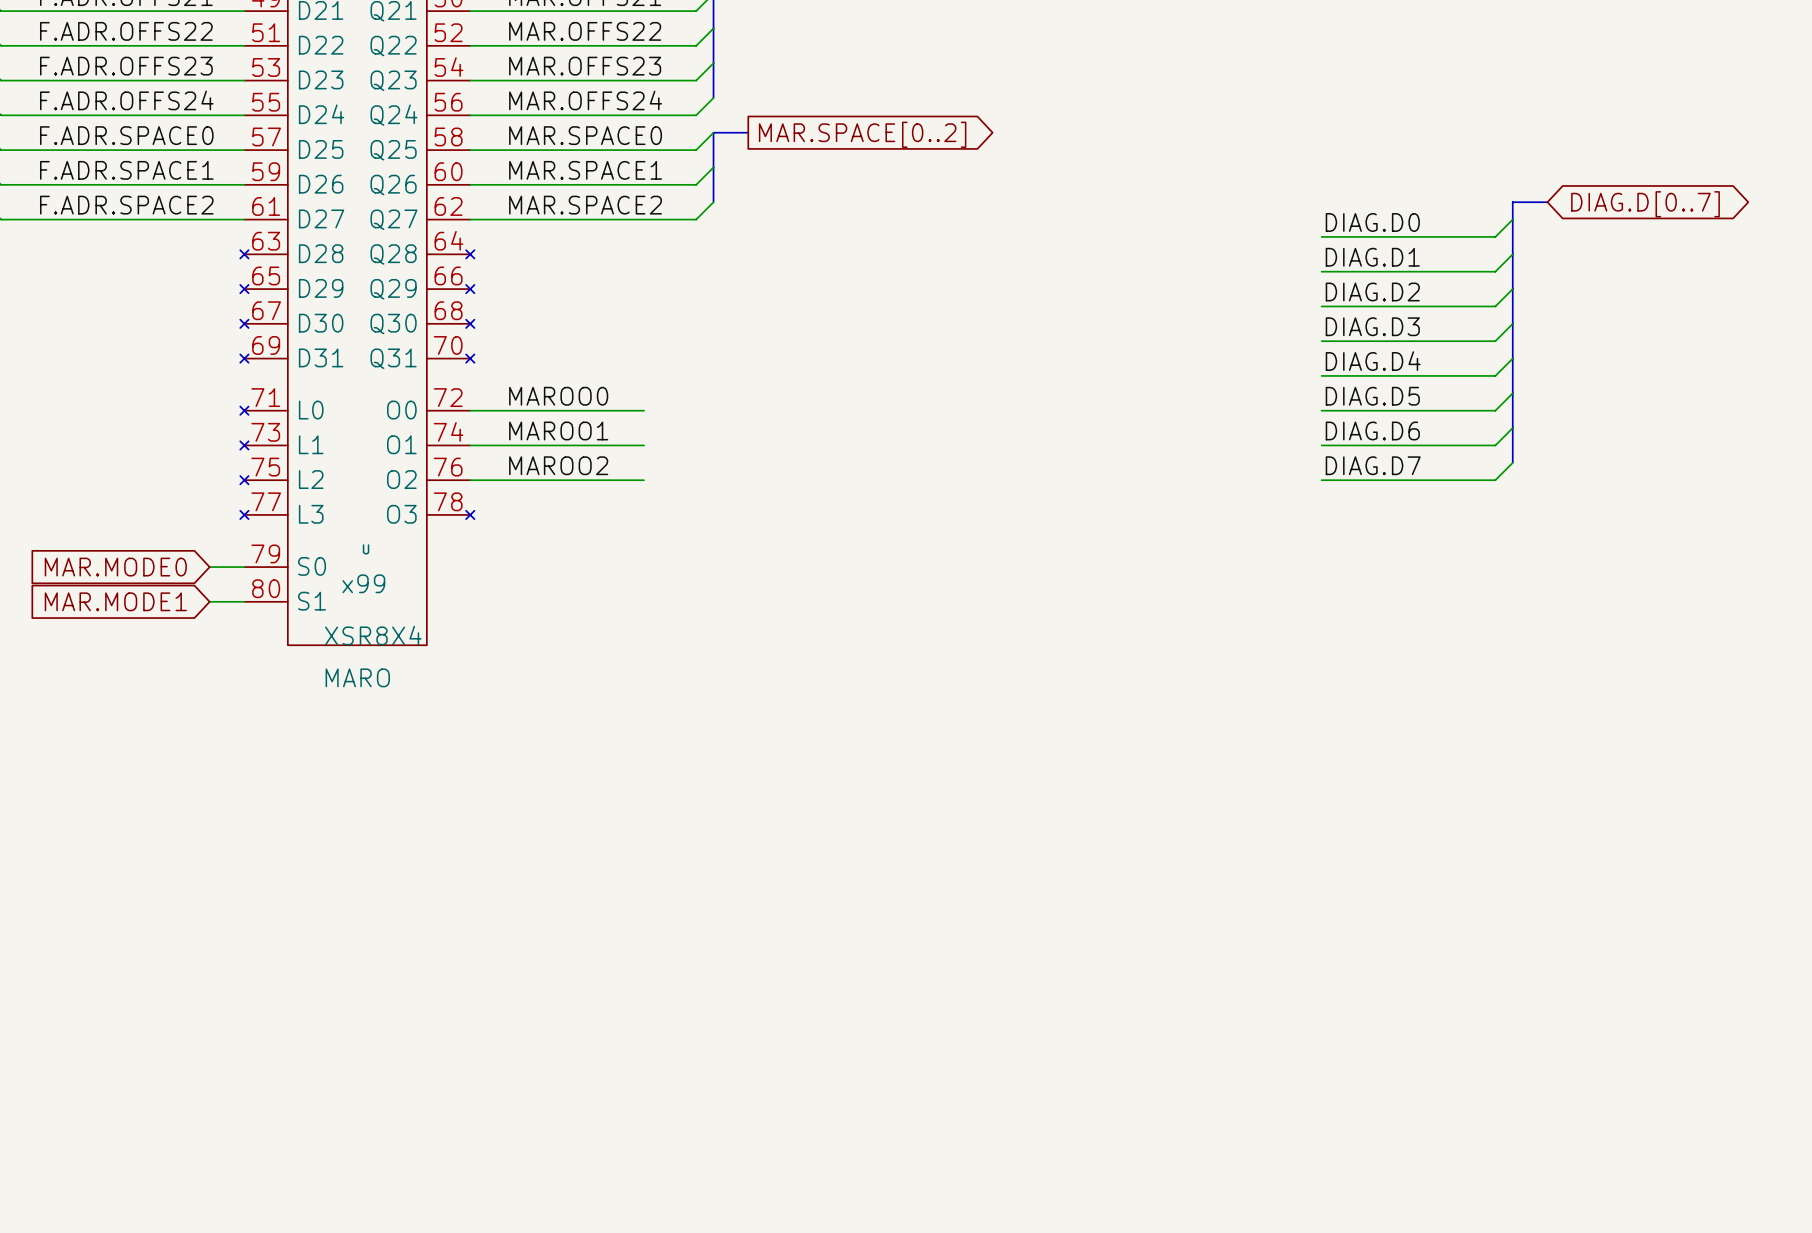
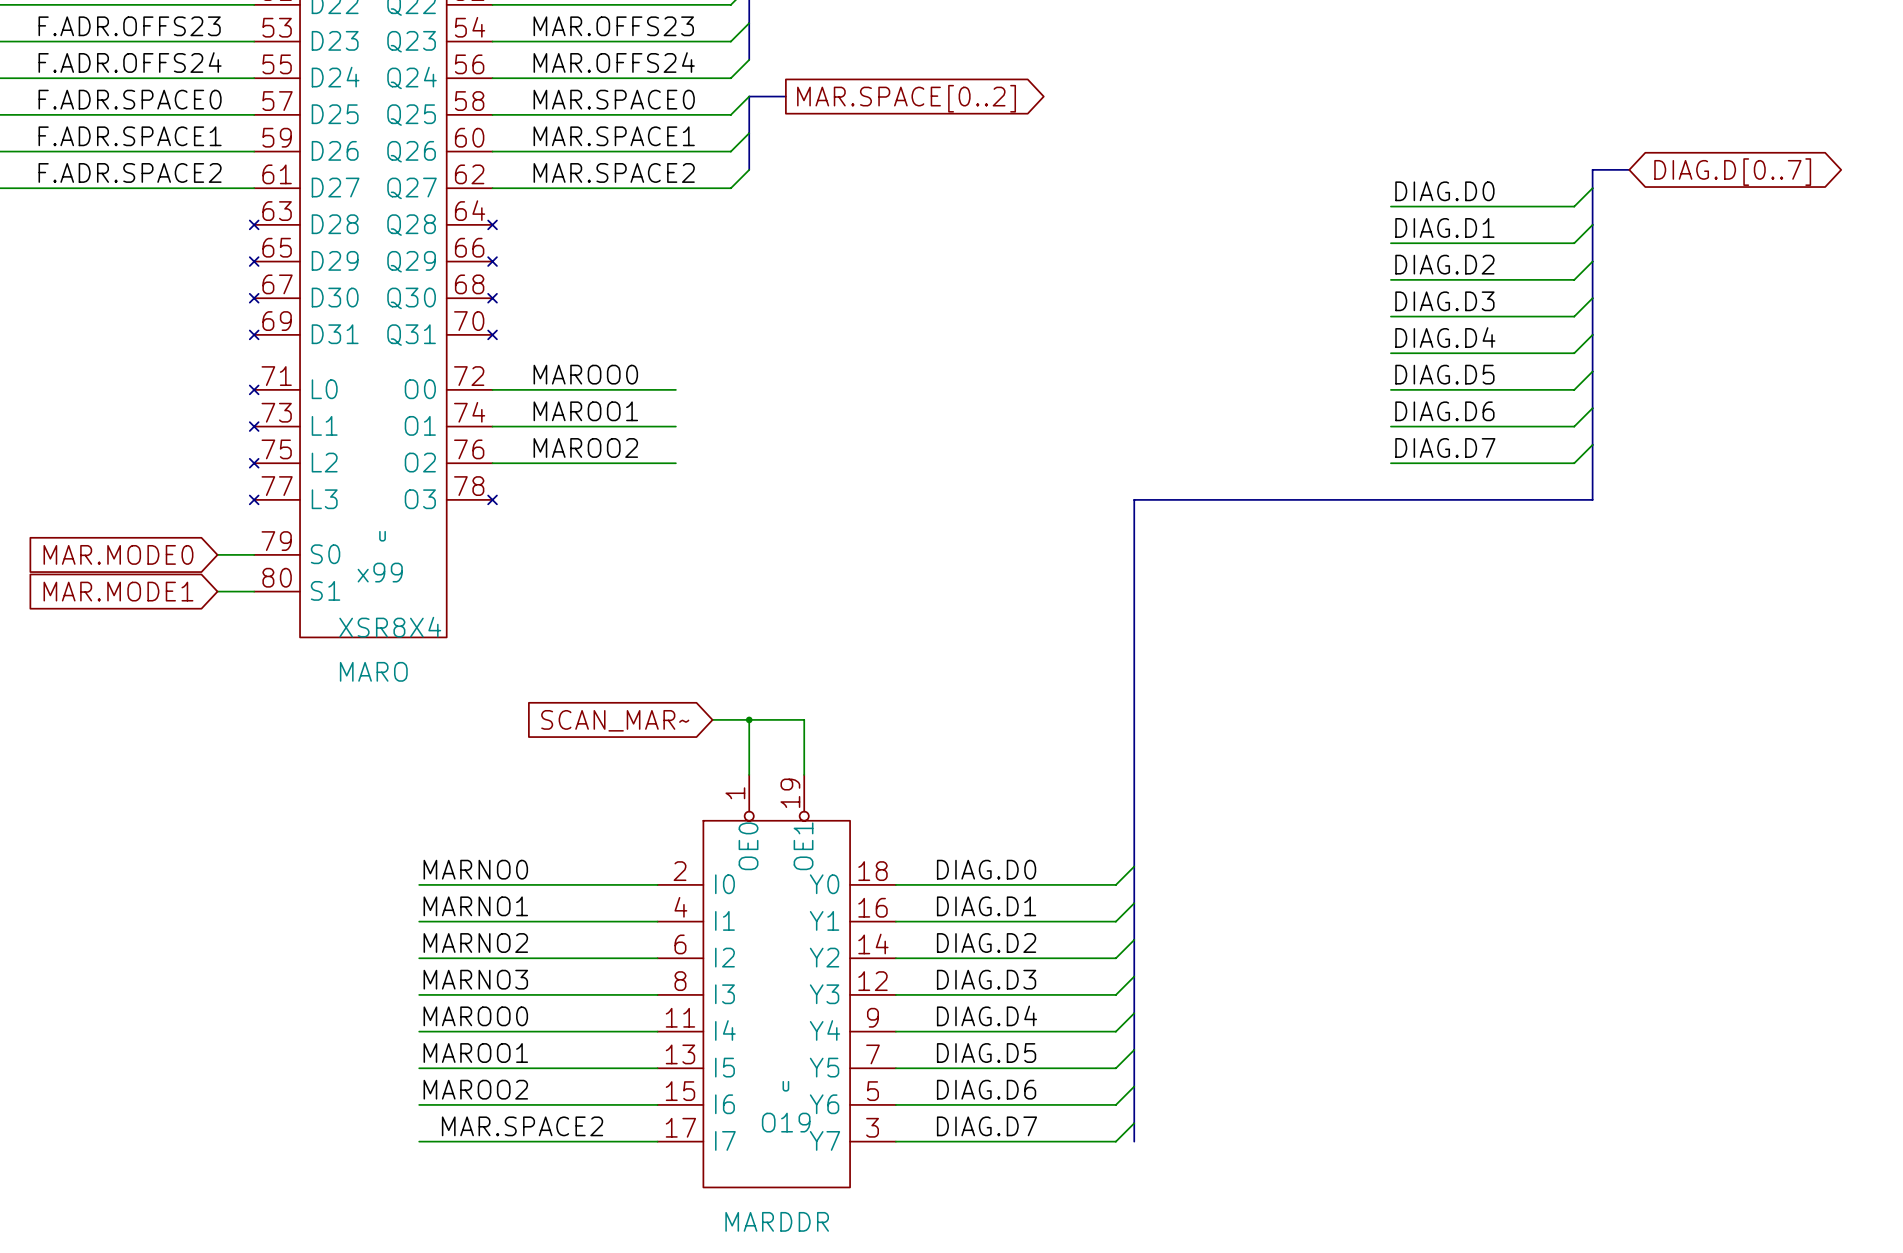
bus: none -> (1592, 444) (1592, 499) (1134, 499) (1134, 1141)
wire: none -> (712, 719) (804, 719) (804, 774)
wire: none -> (749, 719) (749, 774)
junction: none -> (749, 719)
global label: none -> SCAN_MAR~ (615, 720)
wire: none -> (1134, 866) (1115, 884) (895, 884)
label: none -> MARNO0 (475, 869)
label: none -> DIAG.D0 (986, 869)
wire: none -> (419, 884) (657, 884)
wire: none -> (1134, 903) (1115, 921) (895, 921)
label: none -> MARNO1 (475, 906)
label: none -> DIAG.D1 (986, 906)
wire: none -> (419, 921) (657, 921)
wire: none -> (1134, 939) (1115, 958) (895, 958)
label: none -> MARNO2 (475, 943)
label: none -> DIAG.D2 (986, 943)
wire: none -> (419, 958) (657, 958)
wire: none -> (1134, 976) (1115, 994) (895, 994)
label: none -> MARNO3 (475, 979)
label: none -> DIAG.D3 (986, 979)
U: none -> (776, 981)
wire: none -> (419, 994) (657, 994)
wire: none -> (1134, 1013) (1115, 1031) (895, 1031)
label: none -> DIAG.D4 (986, 1015)
label: none -> MAROO0 (475, 1016)
wire: none -> (419, 1031) (657, 1031)
wire: none -> (1134, 1049) (1115, 1068) (895, 1068)
label: none -> MAROO1 (475, 1053)
label: none -> DIAG.D5 (986, 1053)
wire: none -> (419, 1068) (657, 1068)
wire: none -> (1134, 1086) (1115, 1104) (895, 1104)
label: none -> MAROO2 (475, 1089)
label: none -> DIAG.D6 (986, 1089)
wire: none -> (419, 1104) (657, 1104)
wire: none -> (1134, 1123) (1115, 1141) (895, 1141)
label: none -> MAR.SPACE2 (522, 1126)
label: none -> DIAG.D7 (986, 1126)
wire: none -> (419, 1141) (657, 1141)

